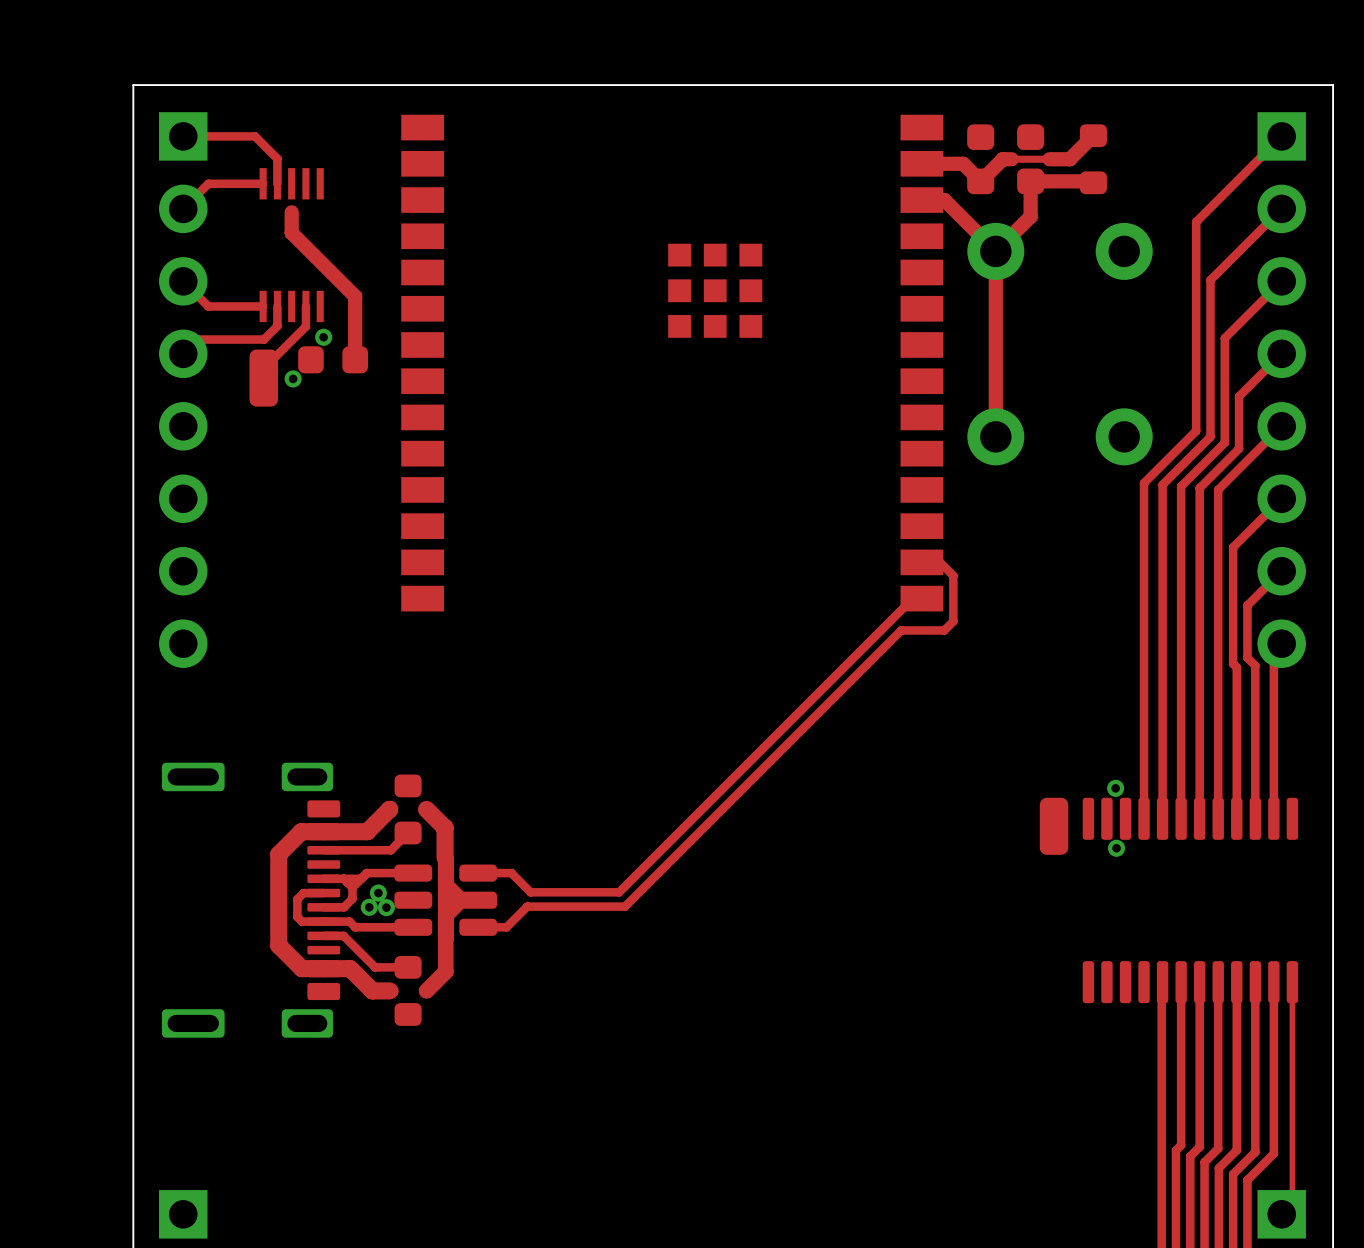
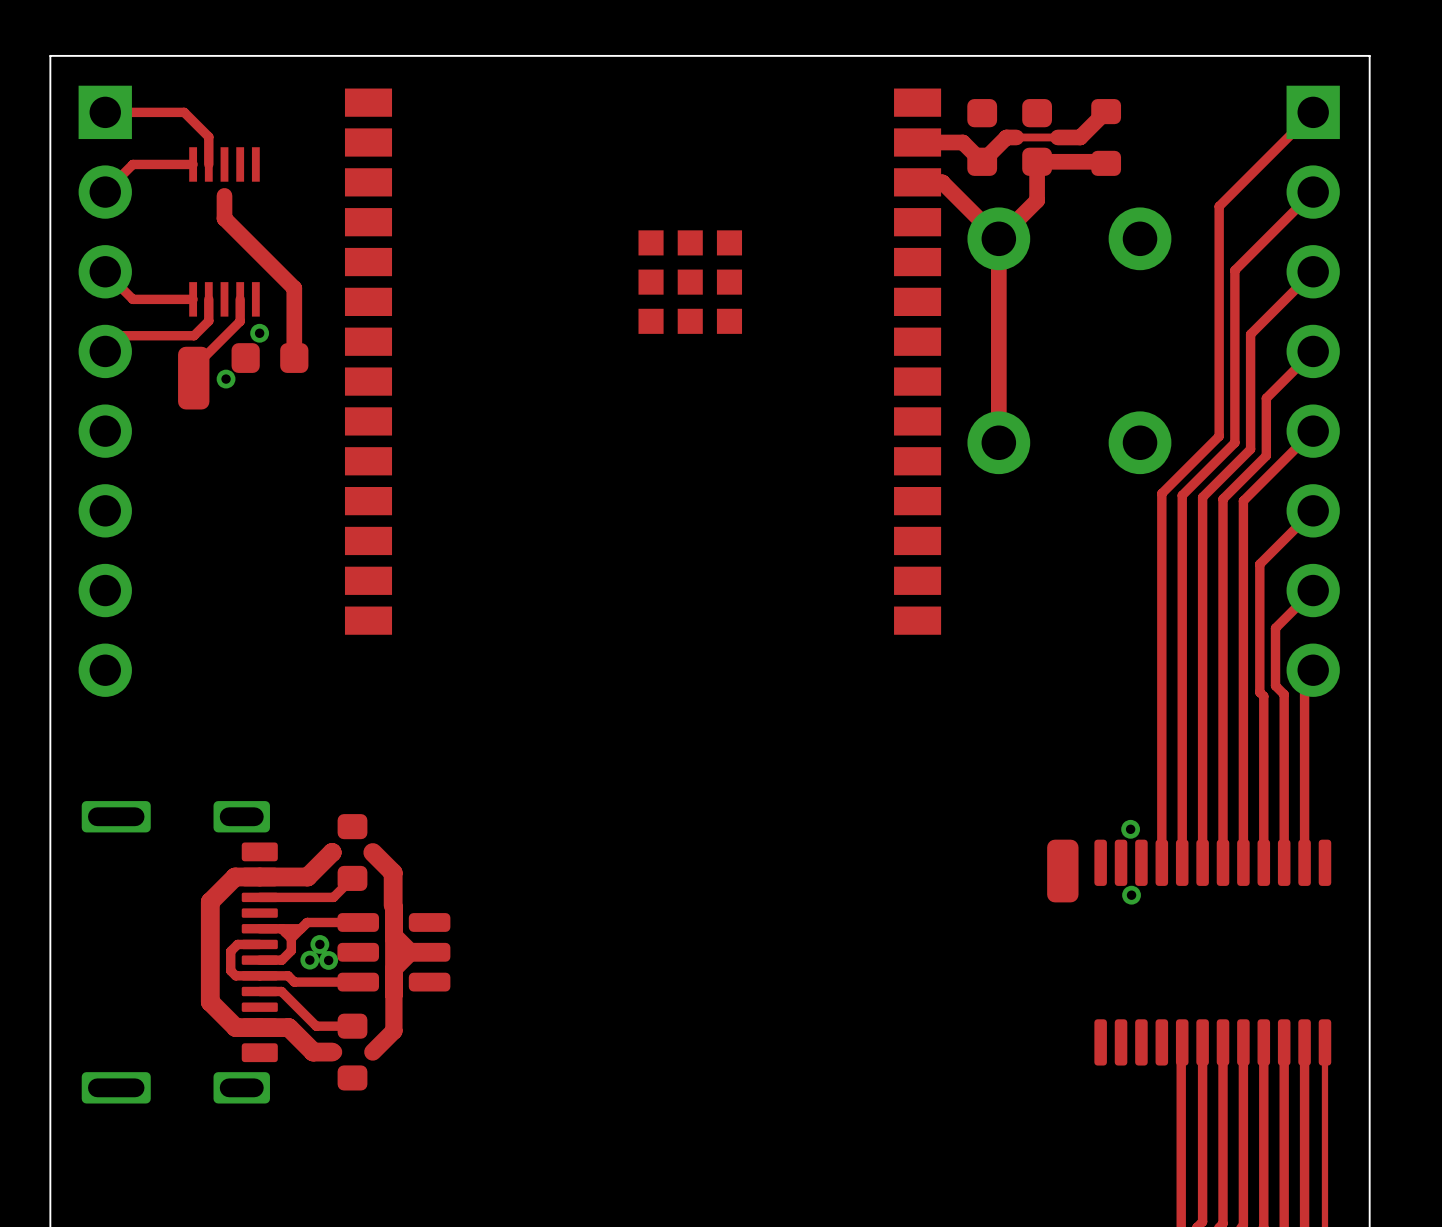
top track: (921, 562) (939, 562) (953, 575) (953, 621) (944, 630) (901, 630) (625, 906) (527, 906) (506, 927) (478, 927) -> none
top track: (921, 598) (912, 598) (619, 892) (530, 892) (511, 873) (478, 873) -> none

